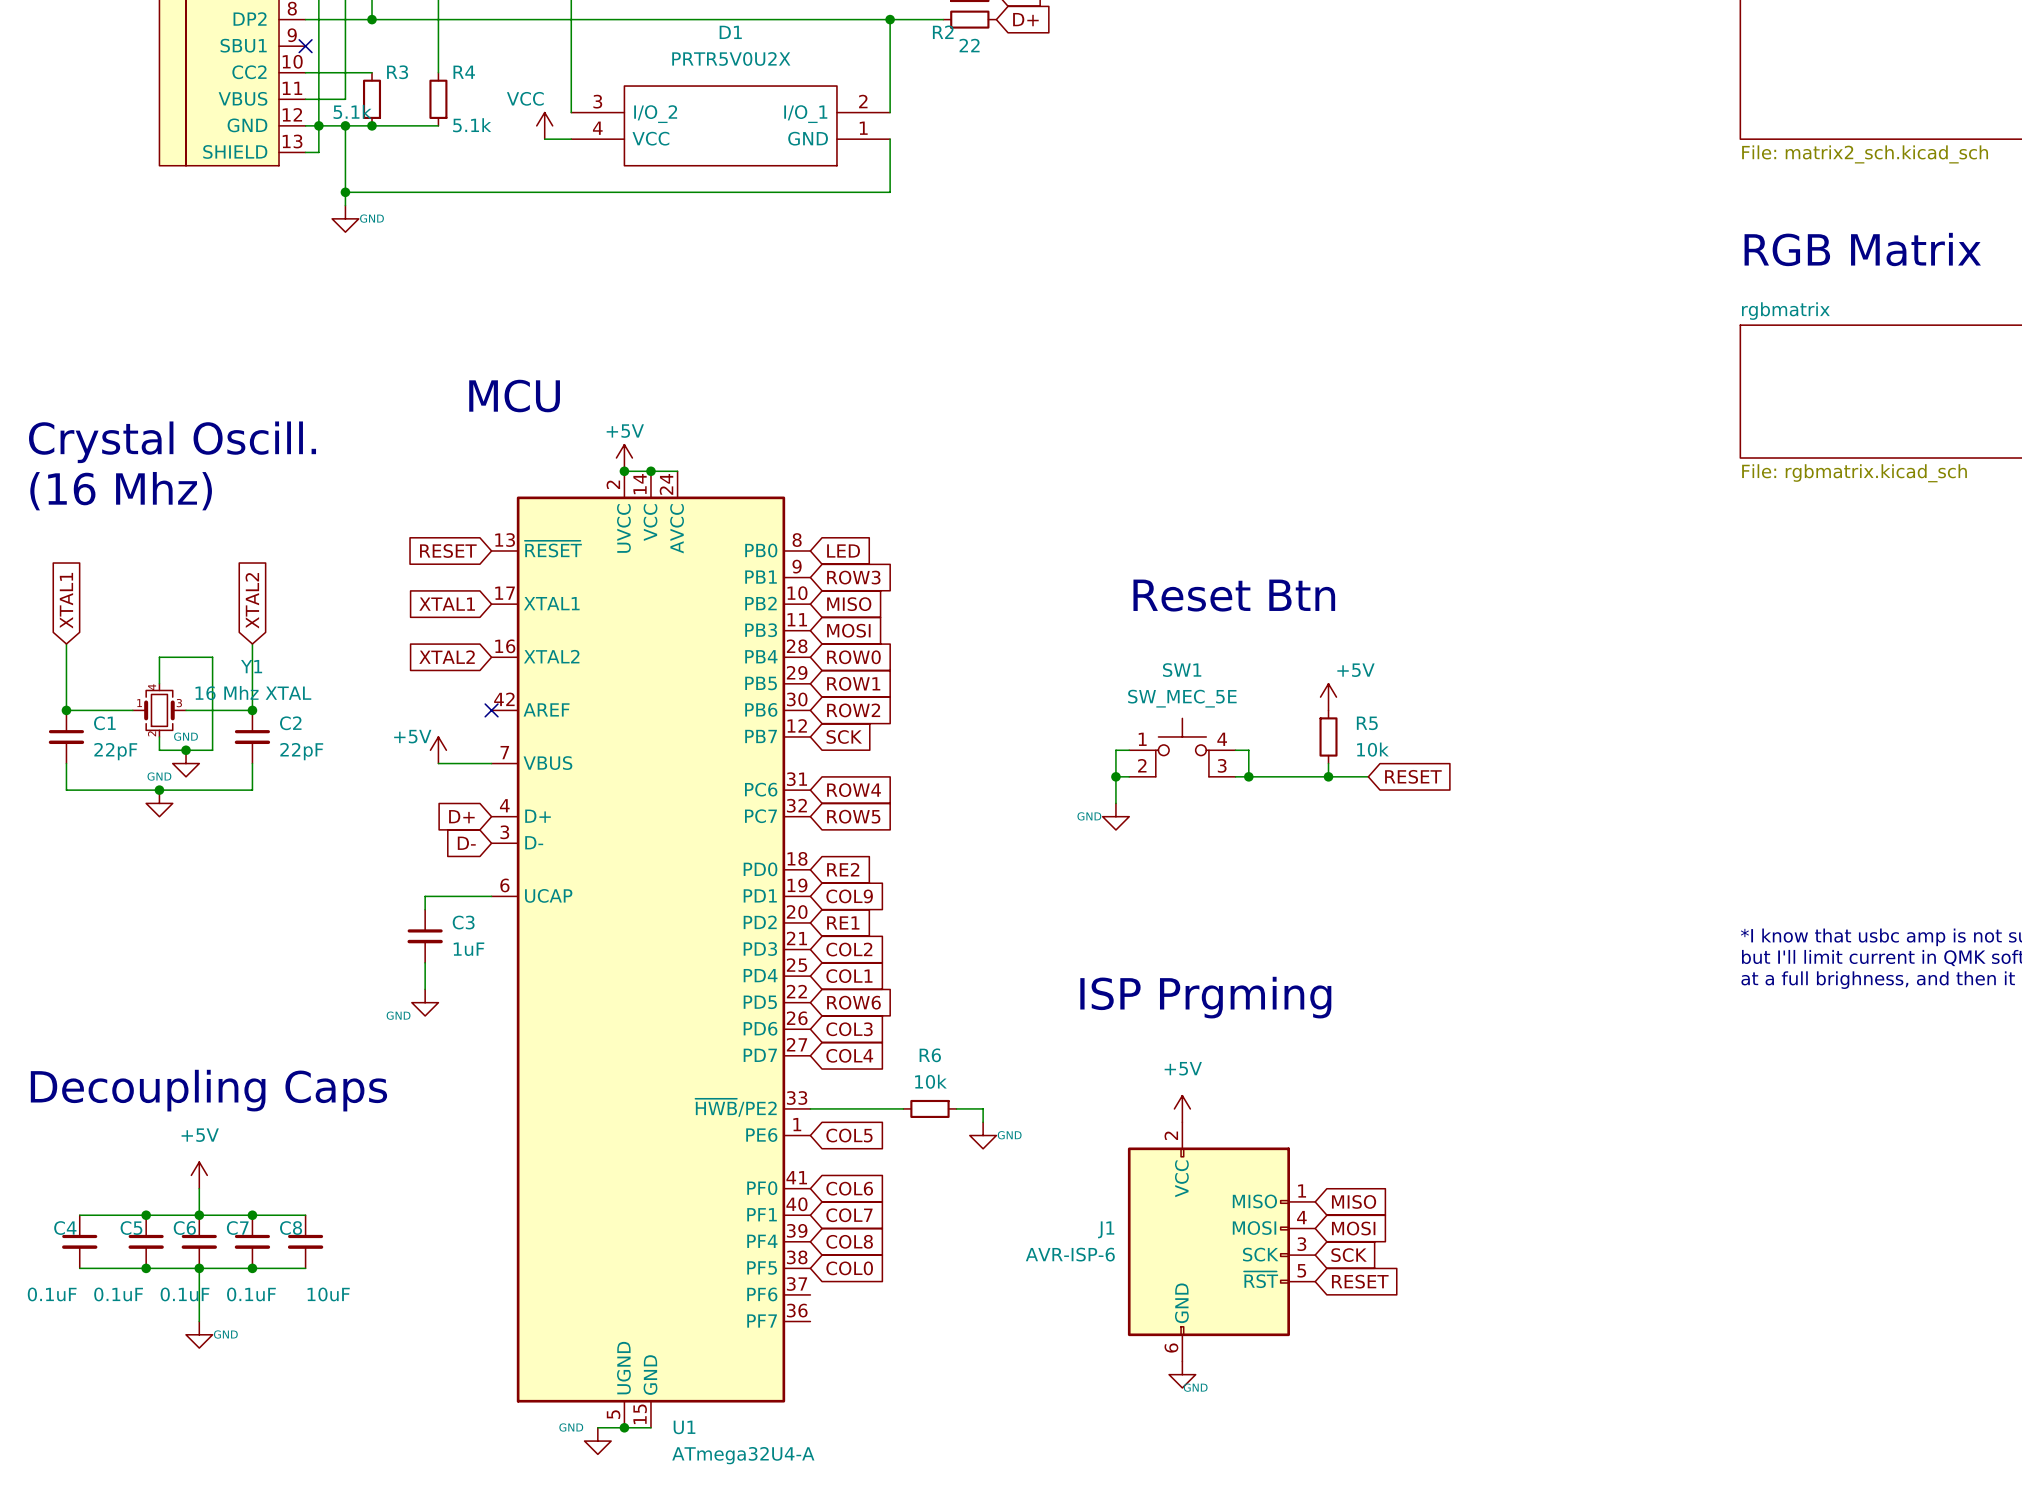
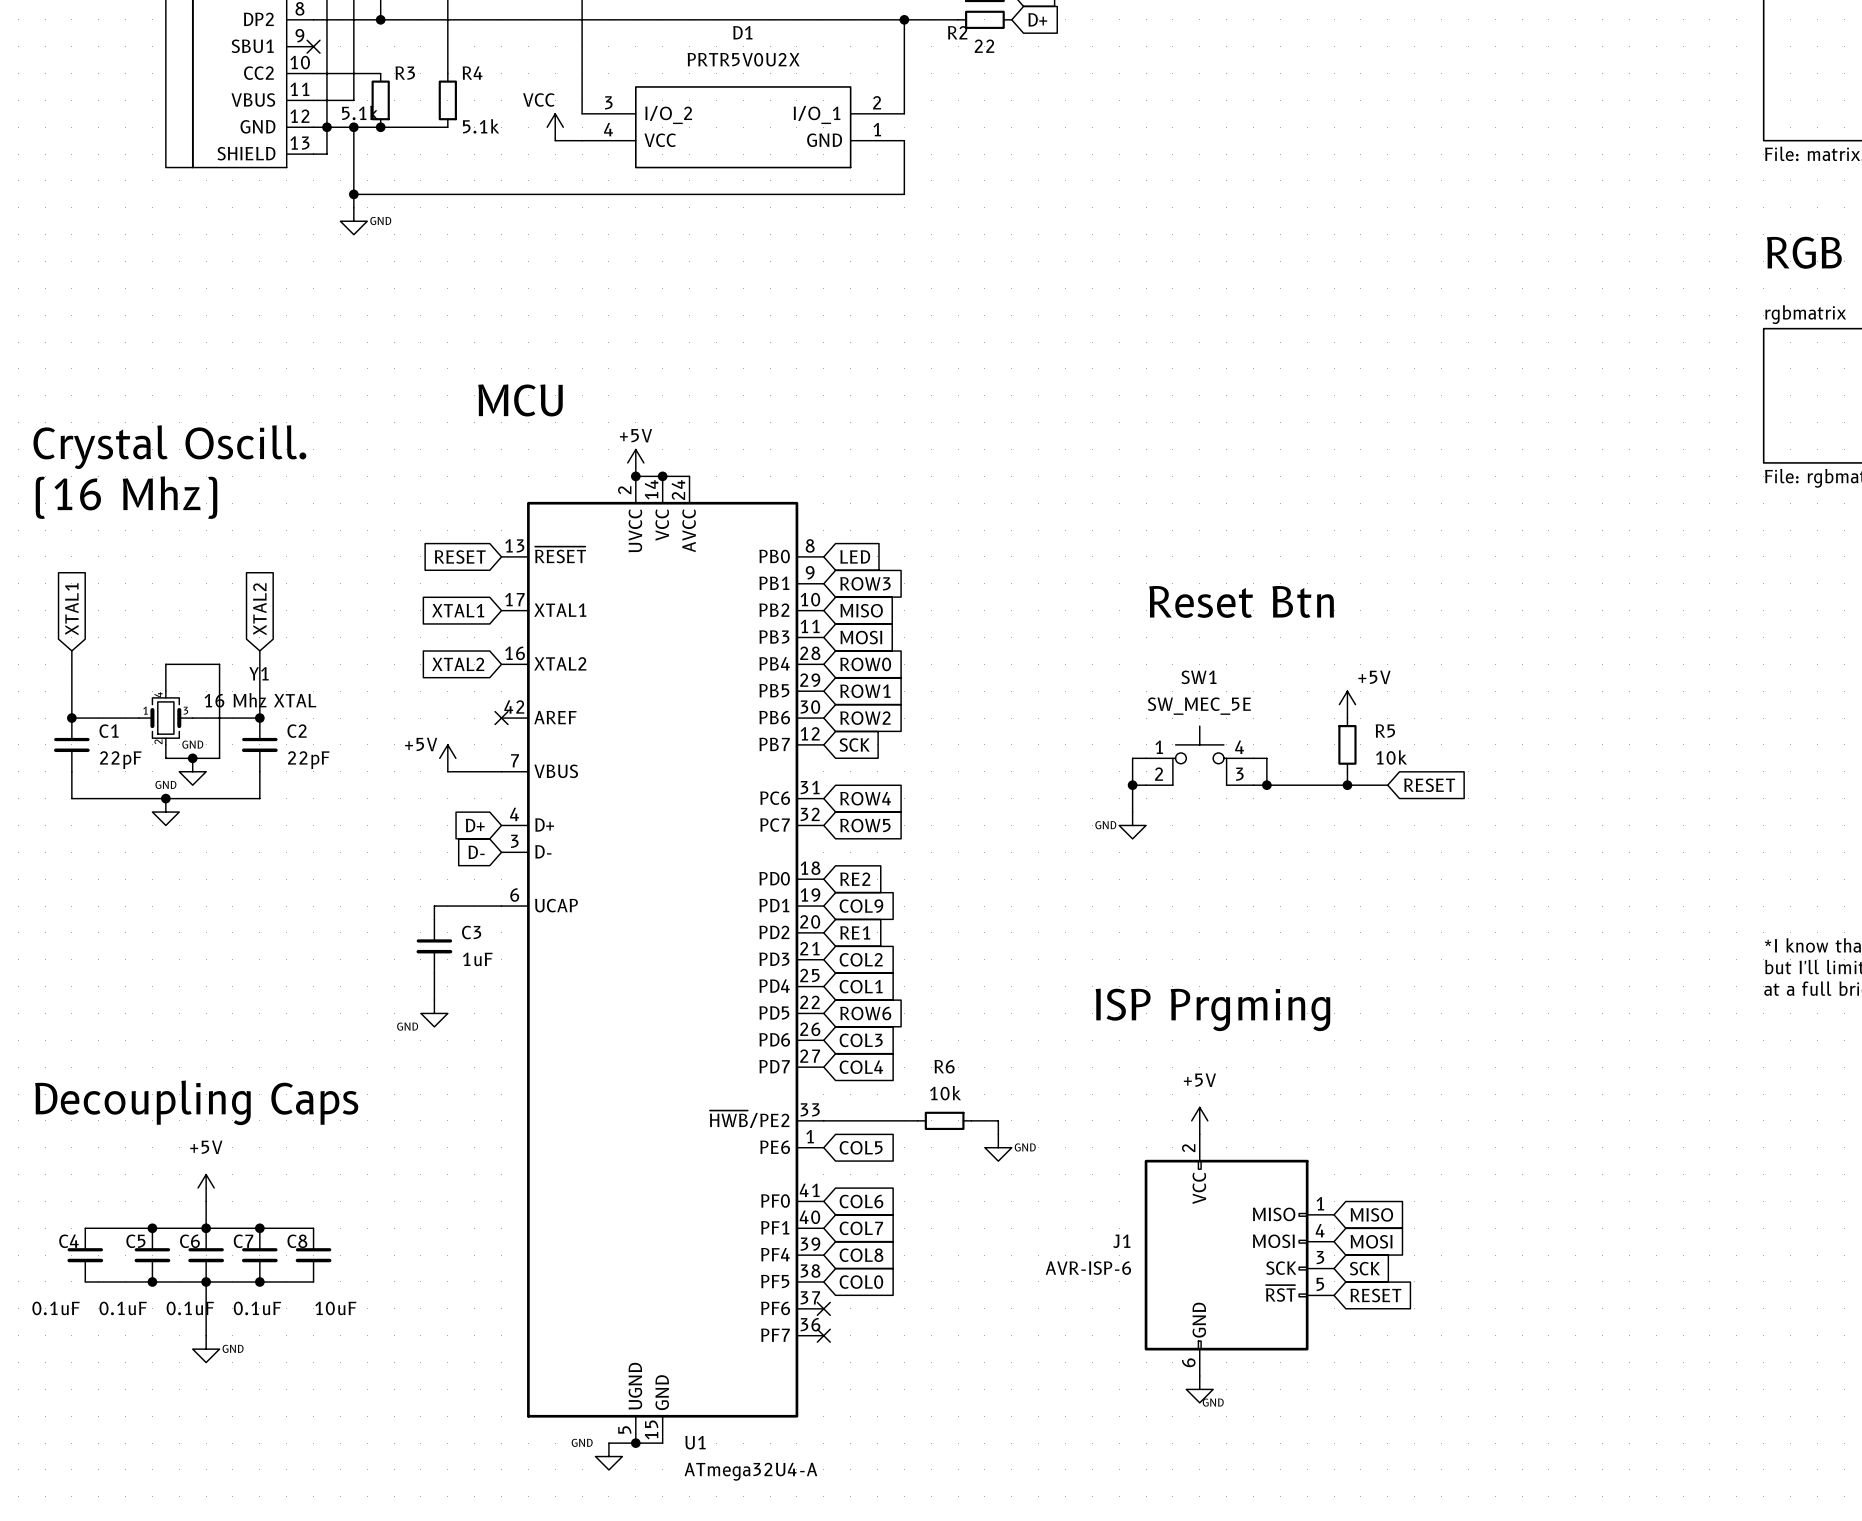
no-connect mark: none -> (823, 1308)
no-connect mark: none -> (823, 1335)

